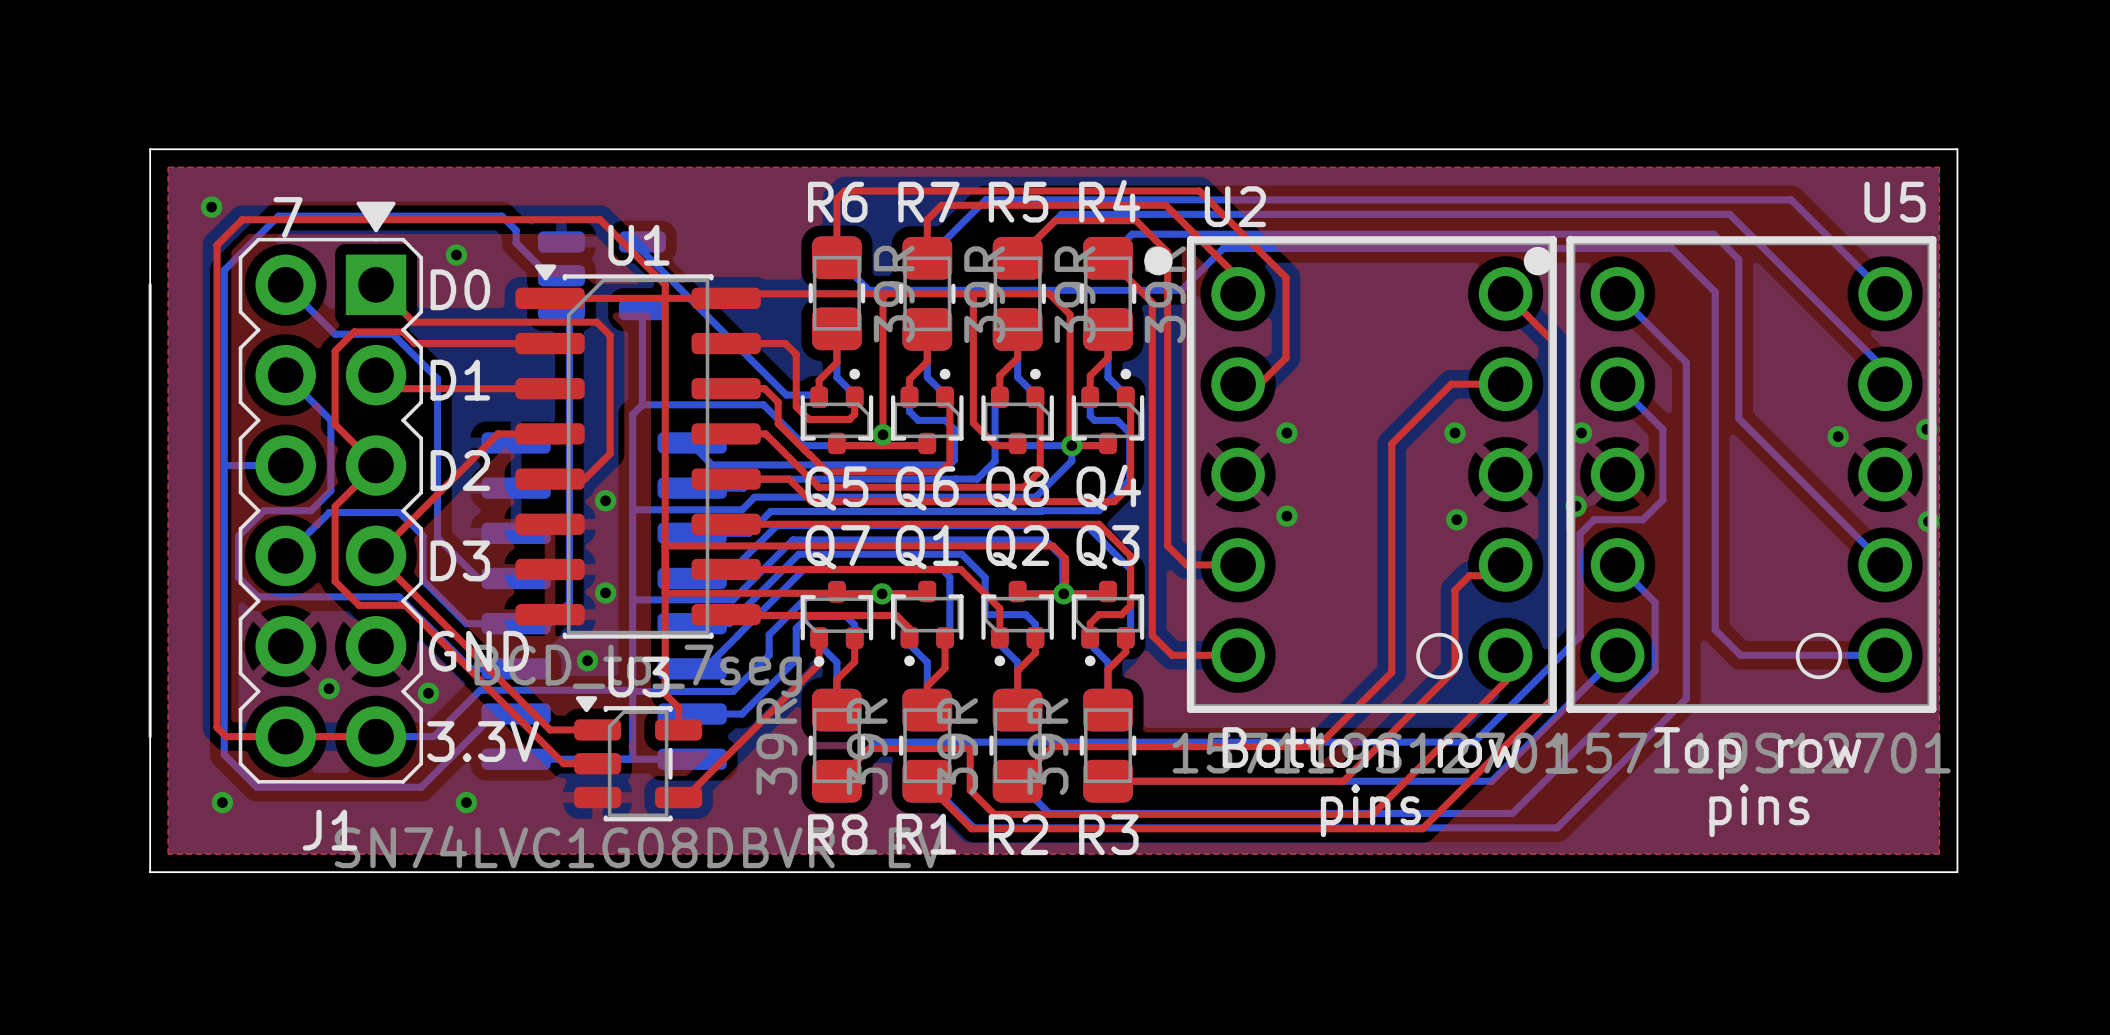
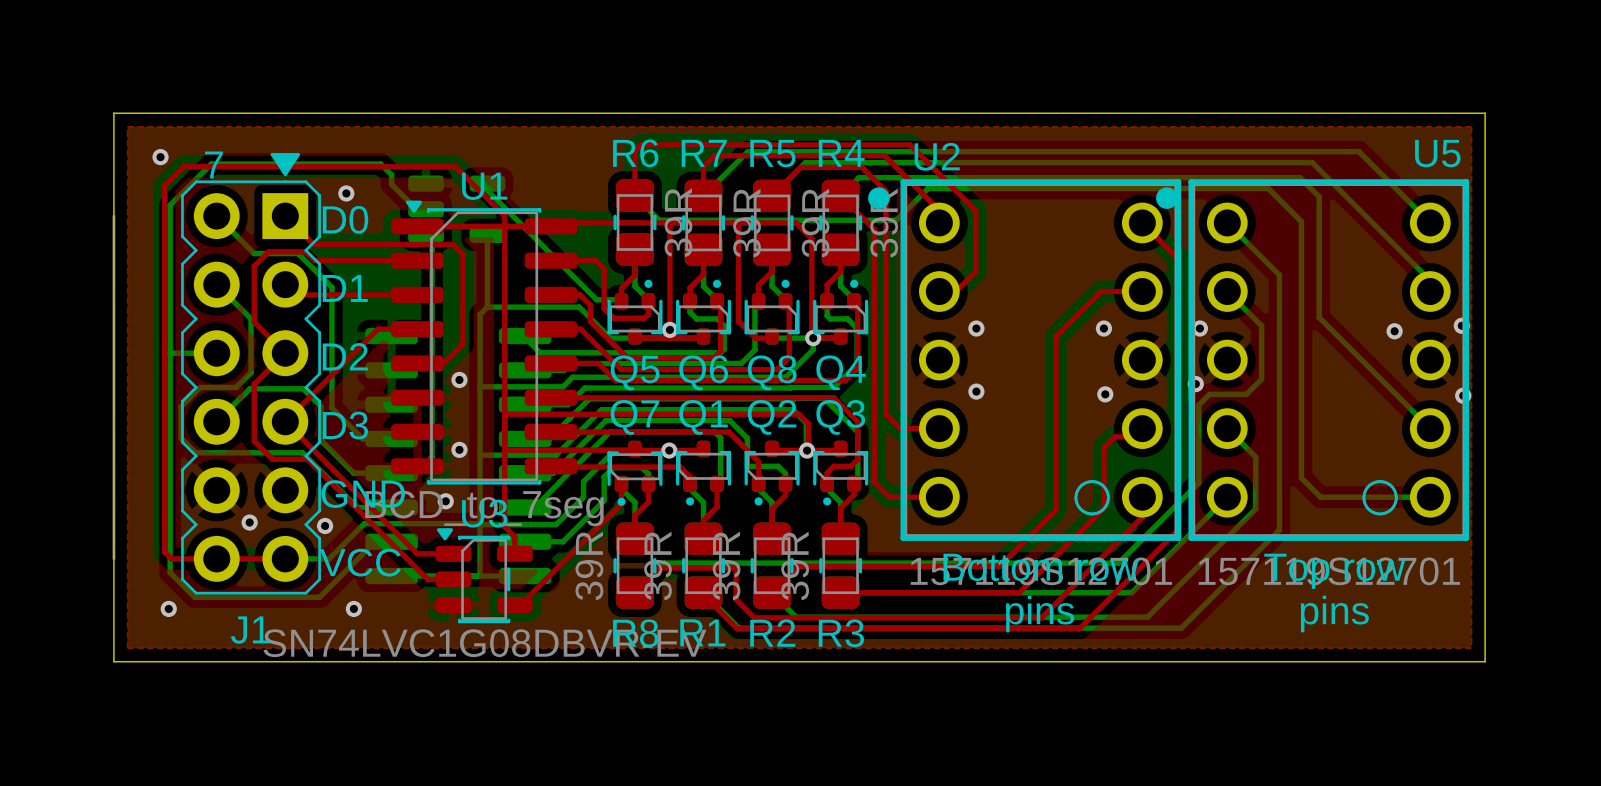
text: 3.3V (483, 741) -> VCC (360, 562)

